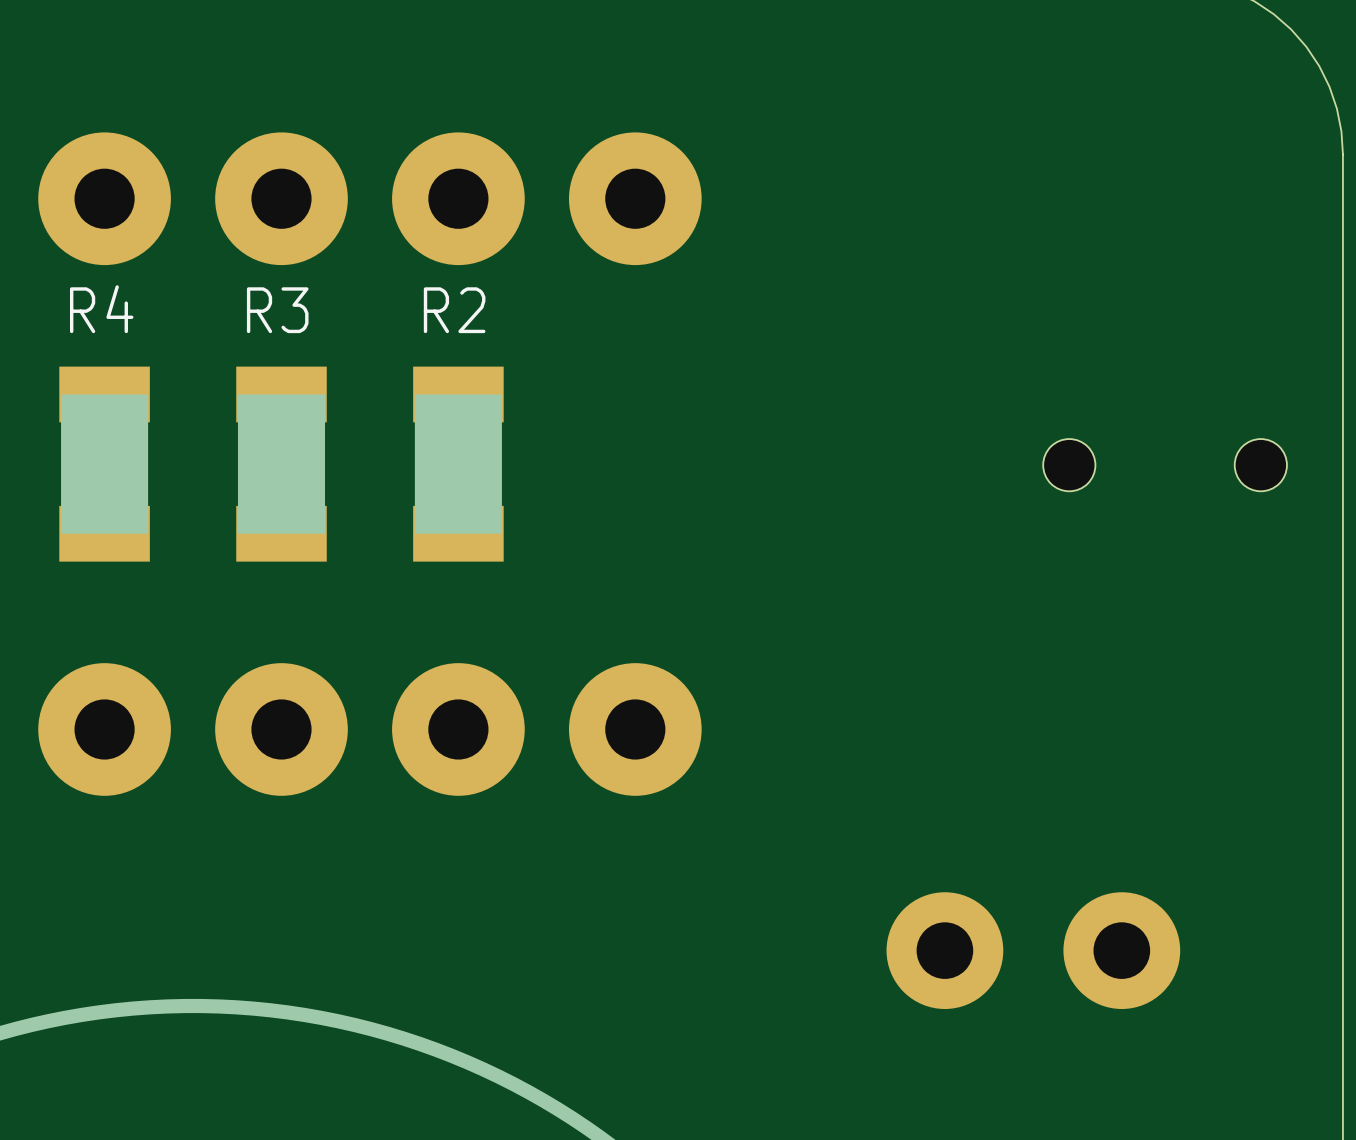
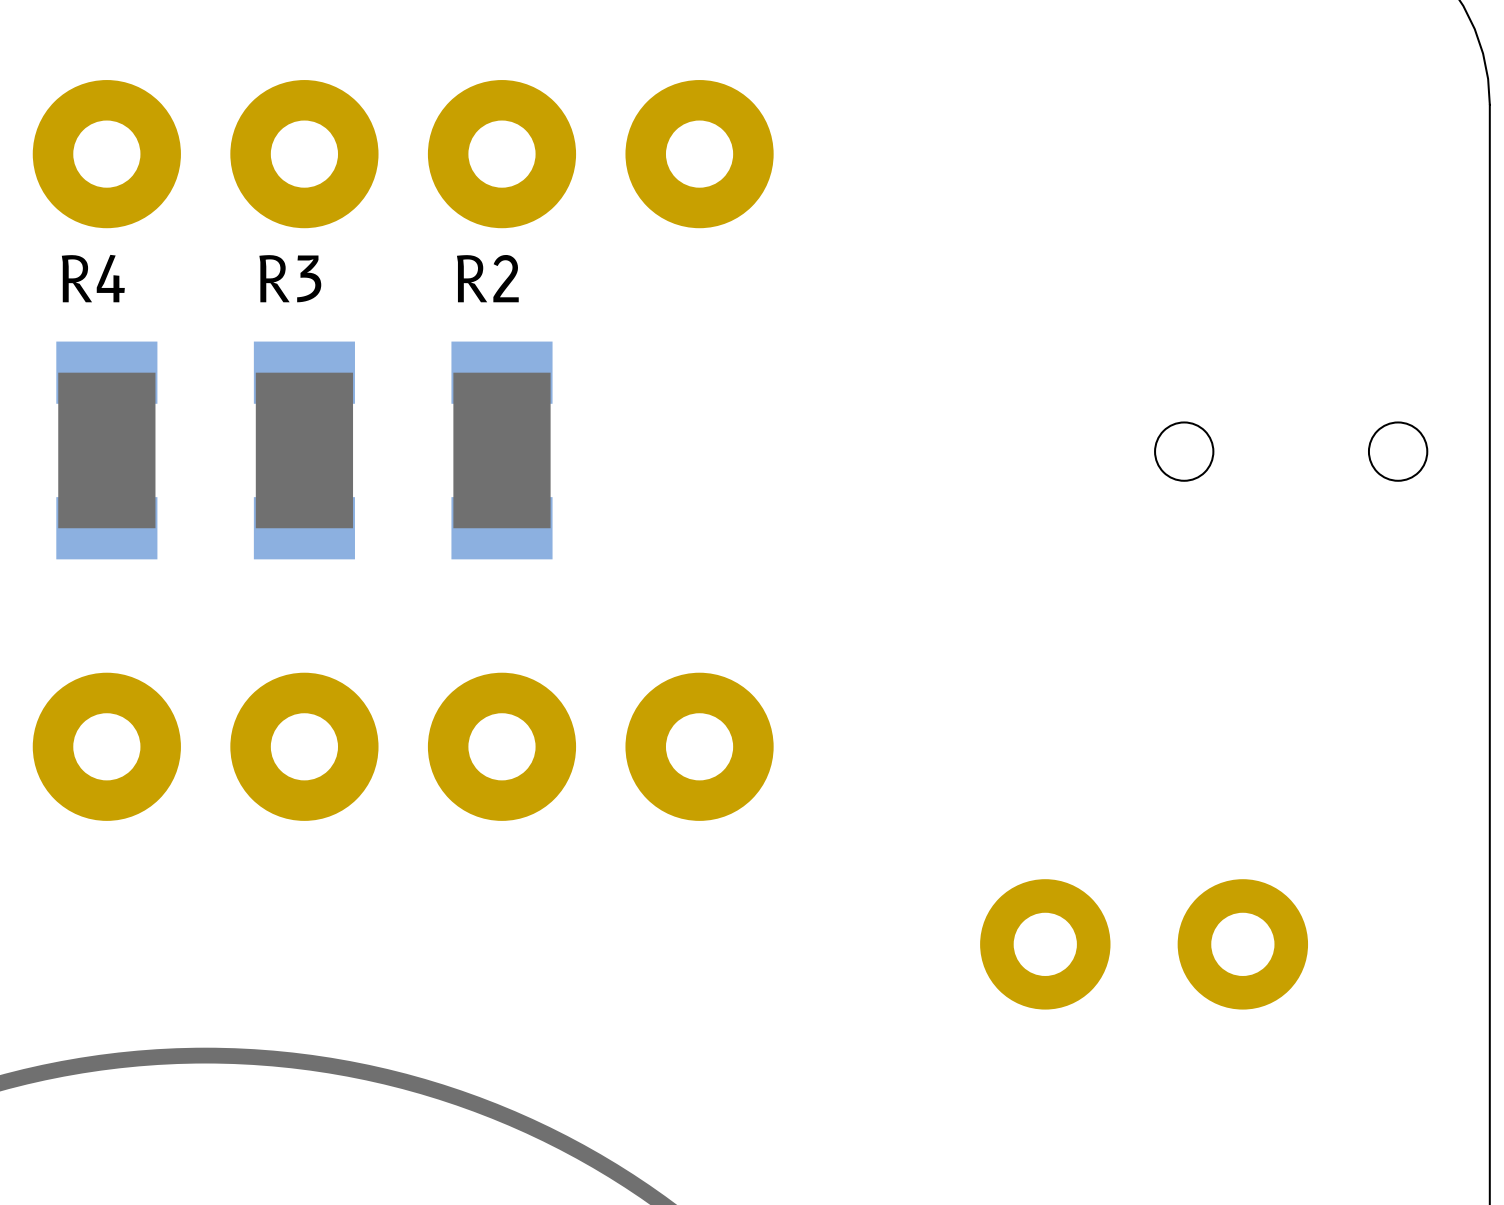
part position: (1033, 950) -> (1144, 944)

